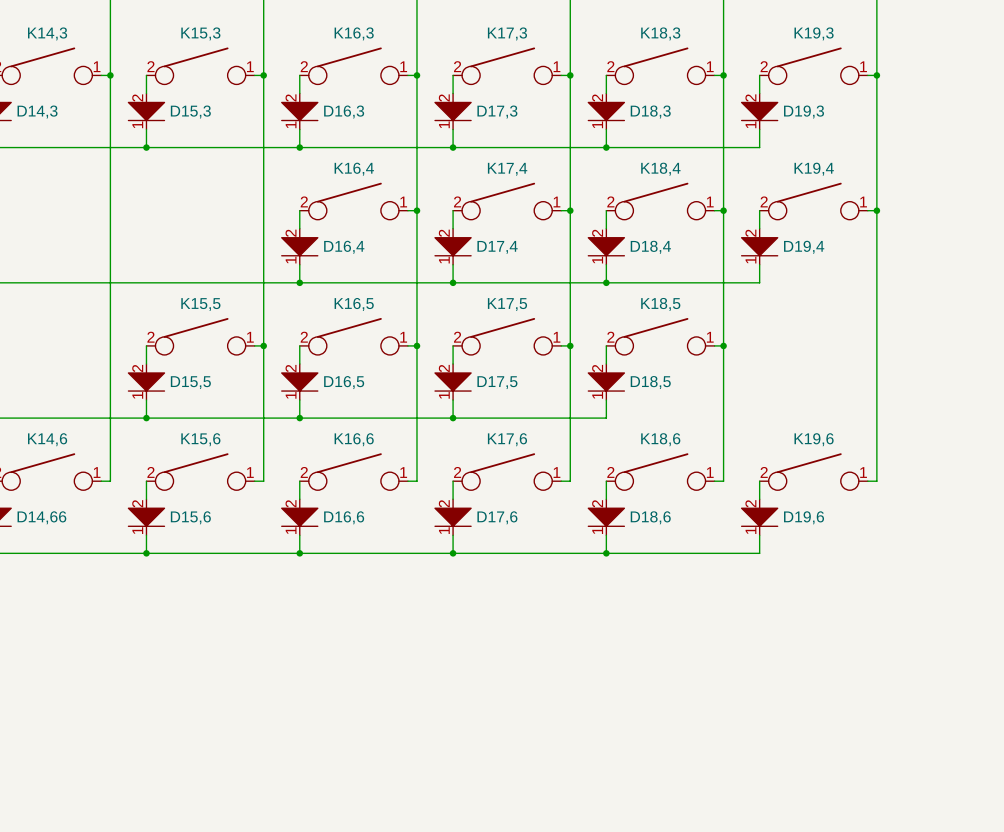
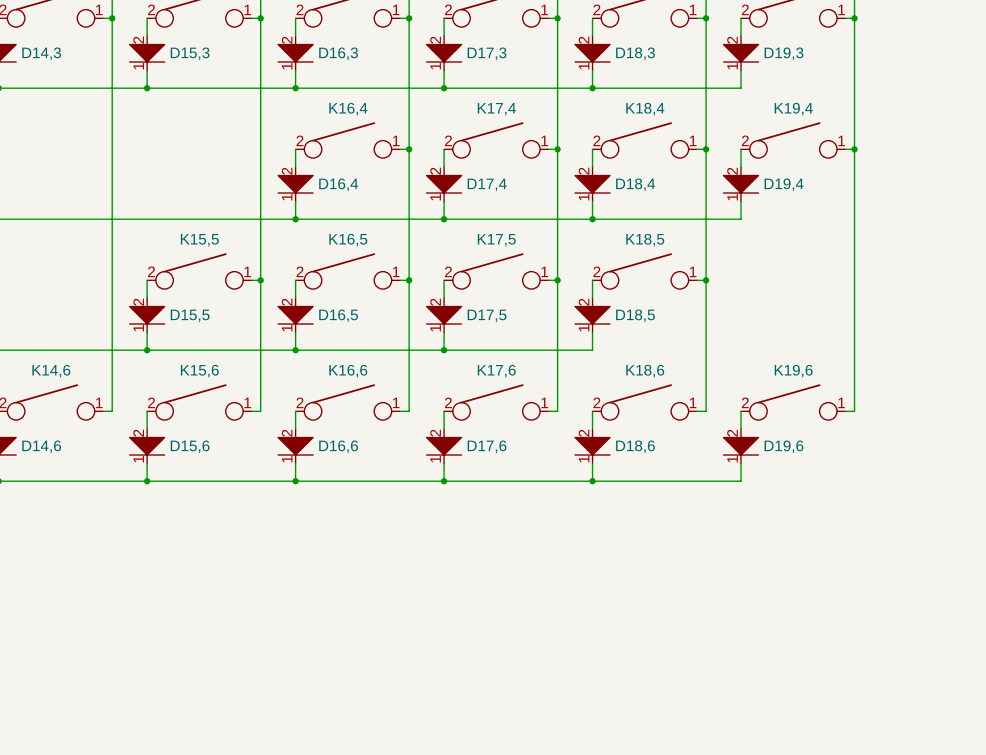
D14,66 name: D14,66 (41, 517) -> D14,6 (41, 446)

